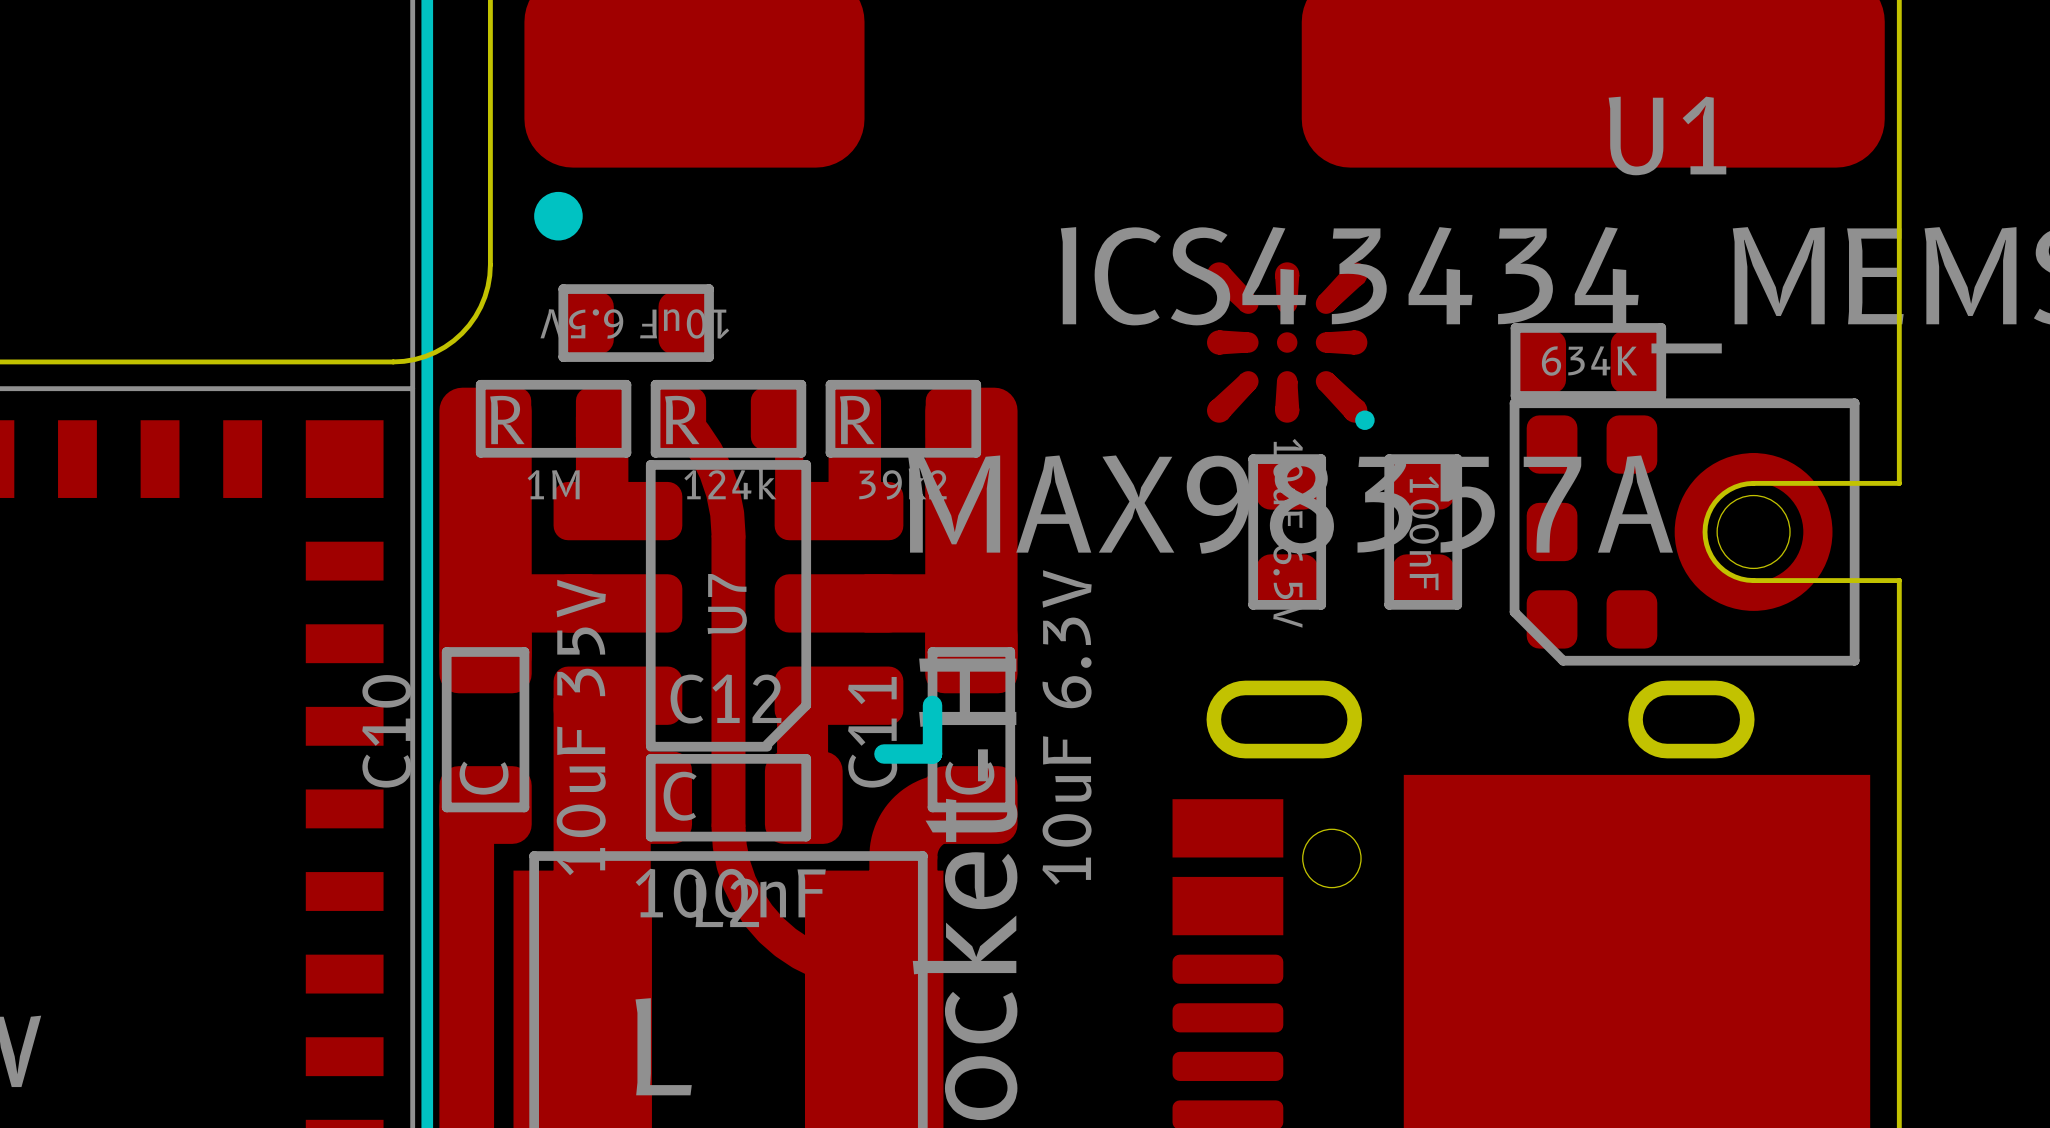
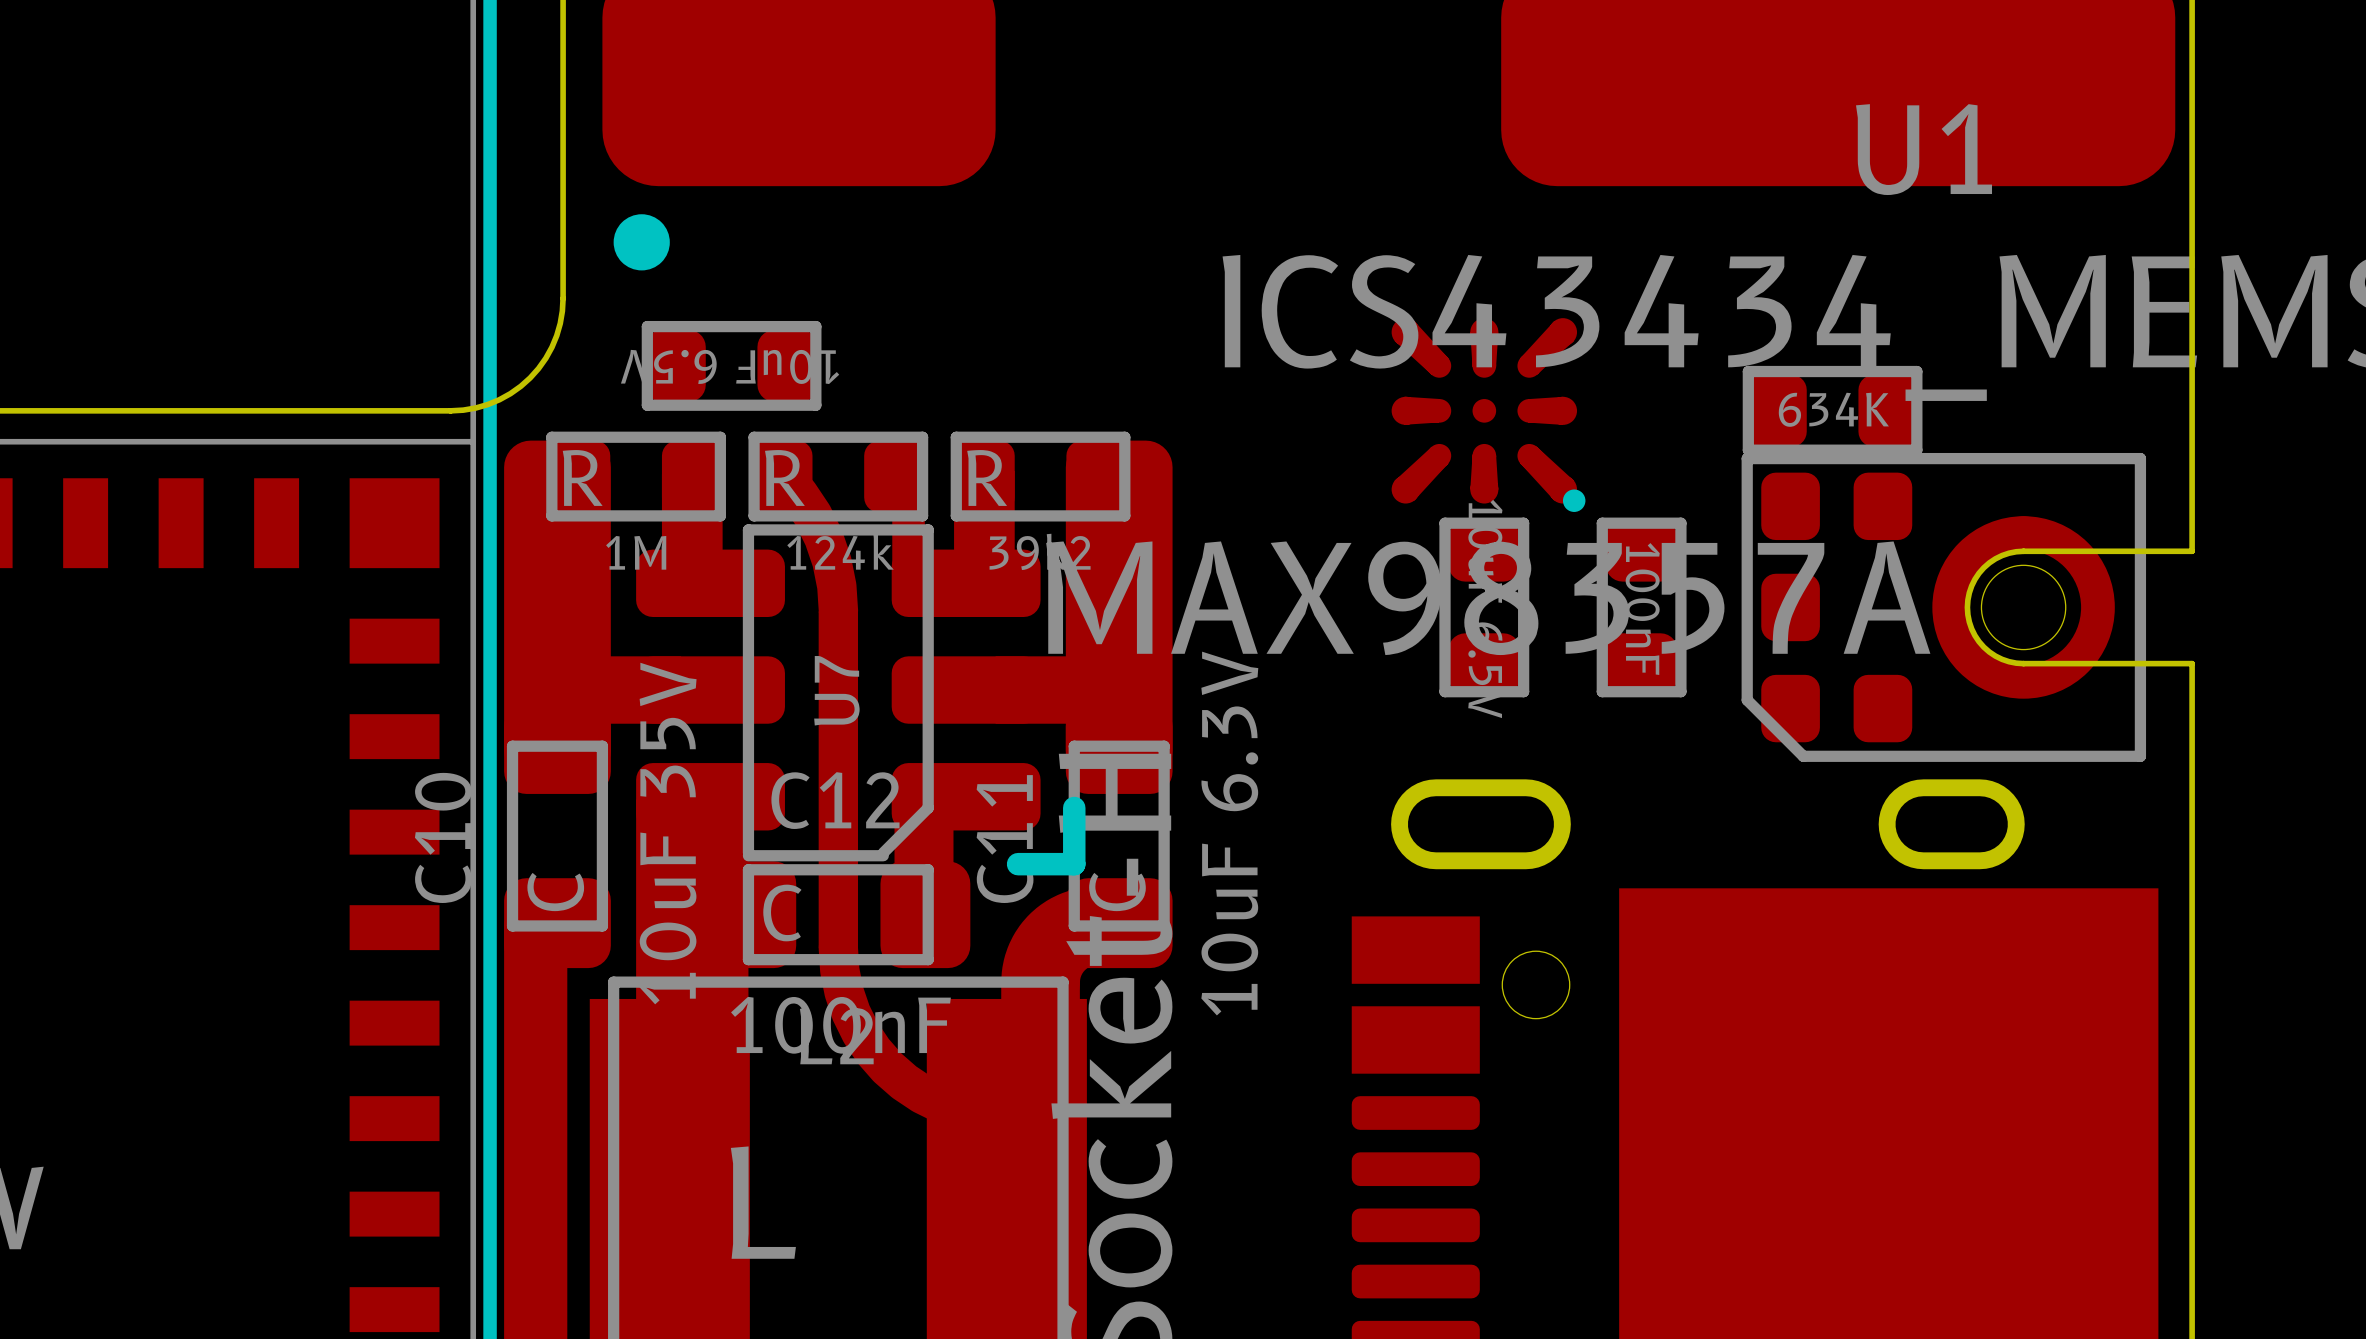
part position: (1290, 346) -> (1488, 415)

